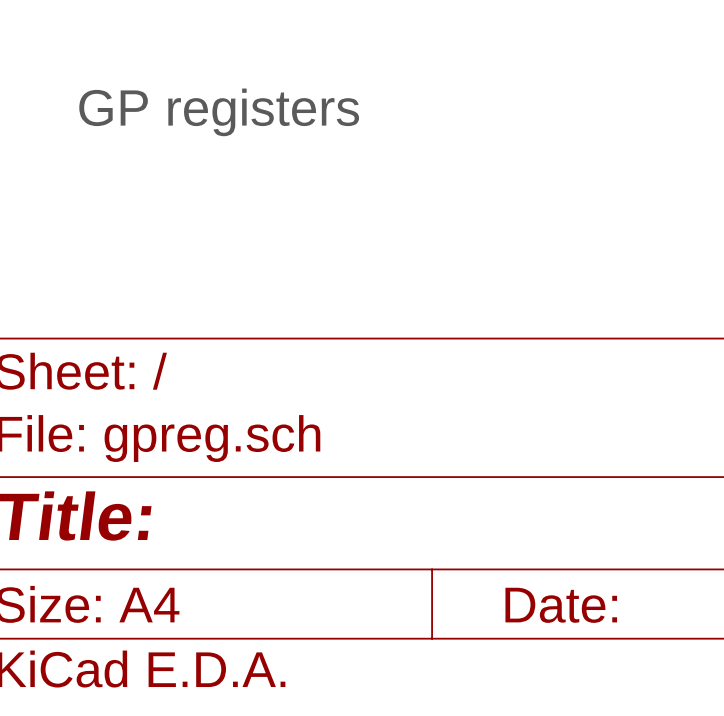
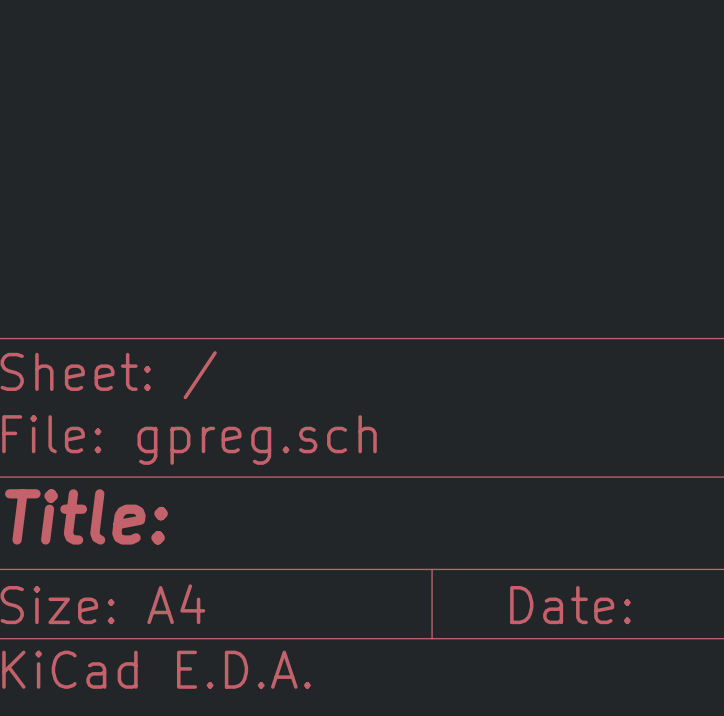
text: GP registers (219, 112) -> none

